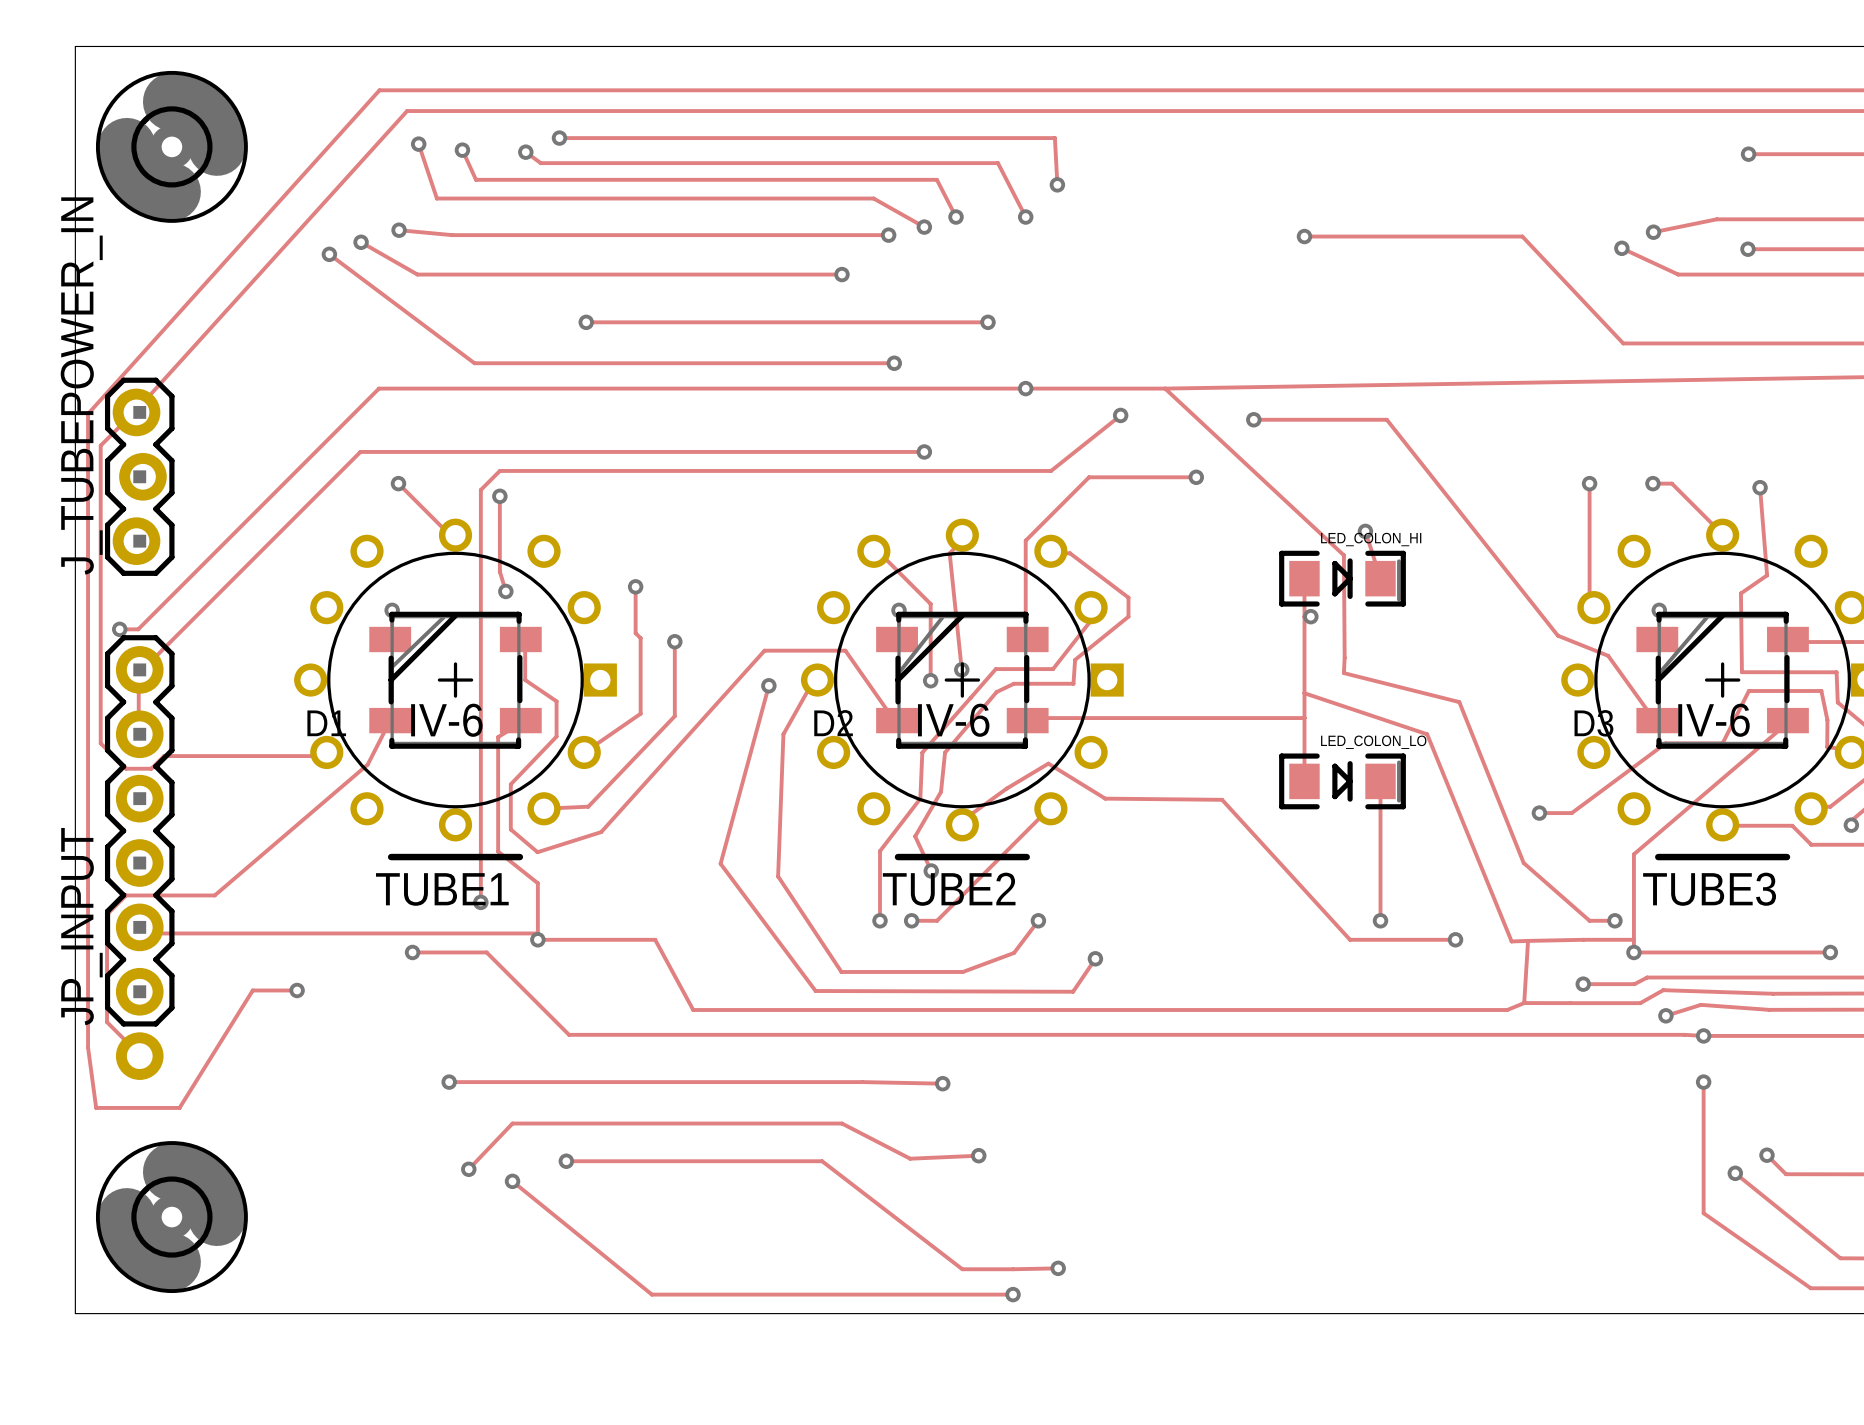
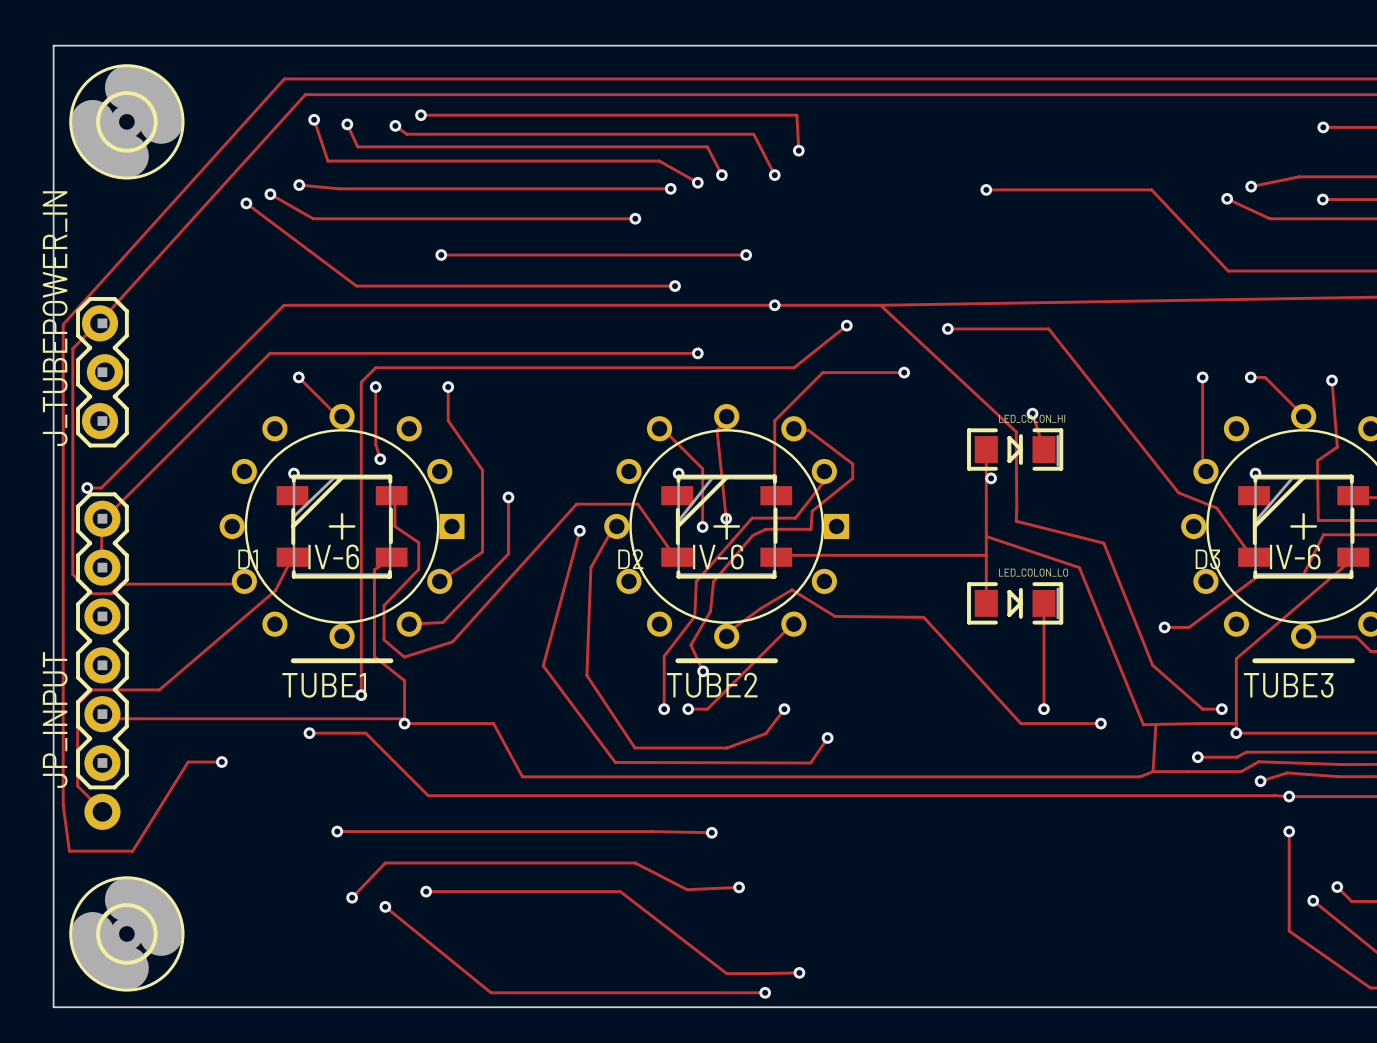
track: (635, 586) (635, 633) (640, 638) -> (448, 387) (448, 420) (482, 470) (482, 494)
via position: (635, 586) -> (448, 387)

